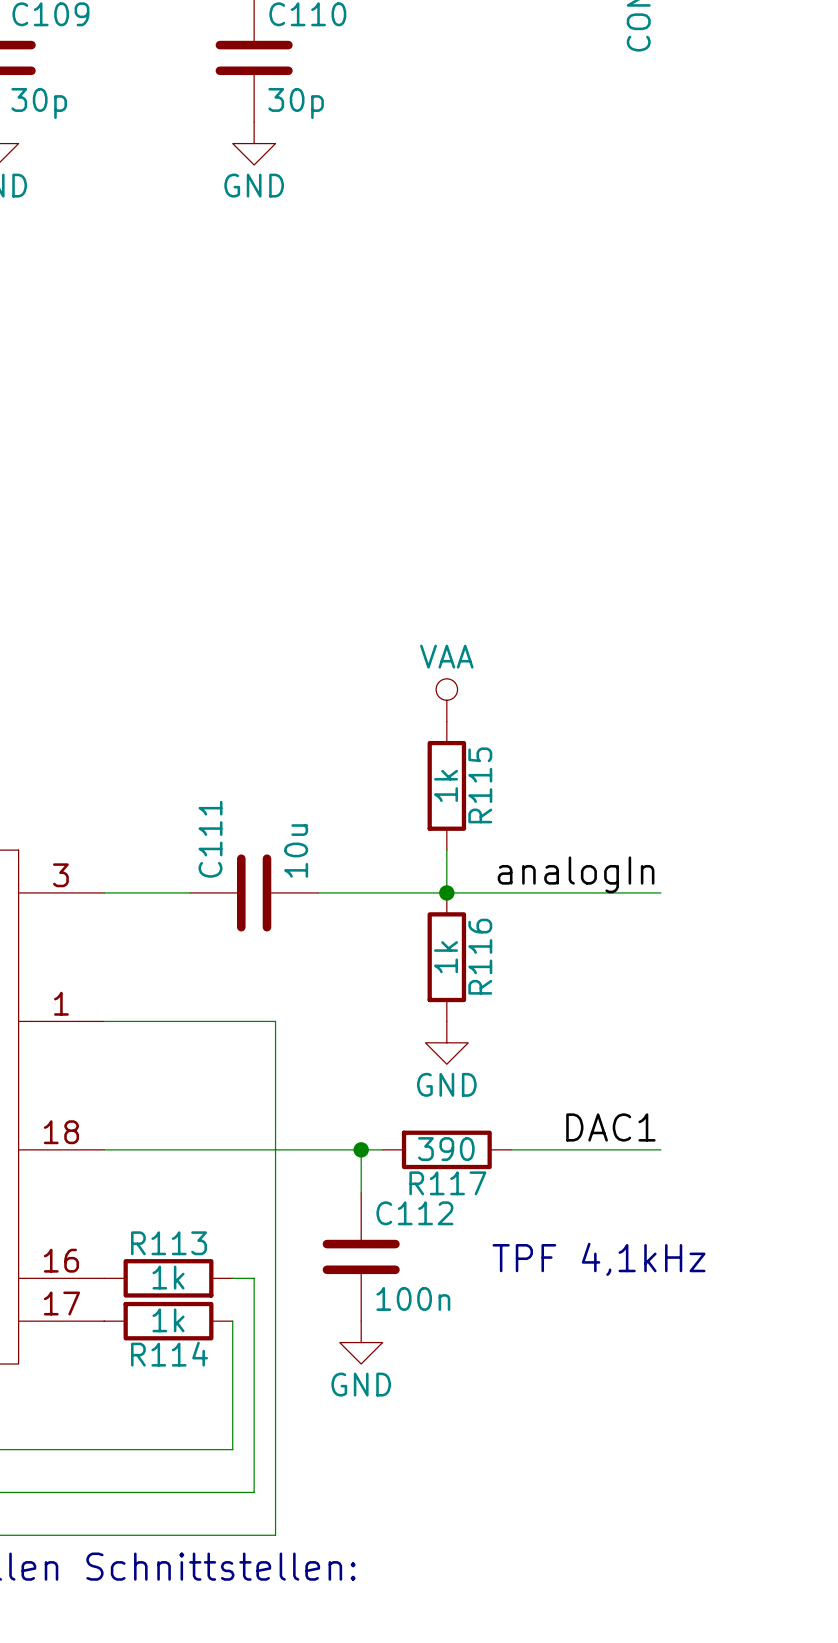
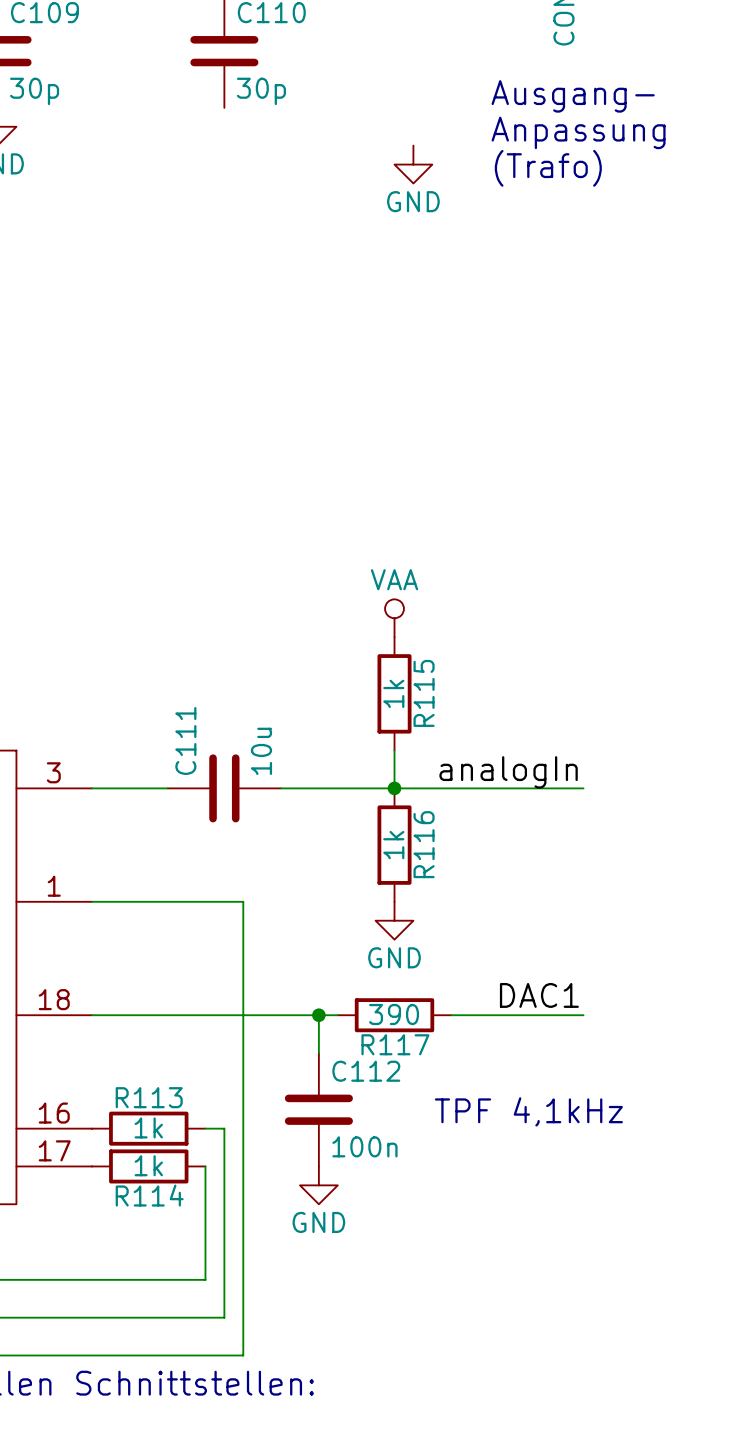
text: none -> Ausgang- (573, 96)
power symbol: GND (254, 143) -> none
text: none -> Anpassung (578, 132)
power symbol: none -> GND (413, 164)
text: none -> (Trafo) (548, 168)

